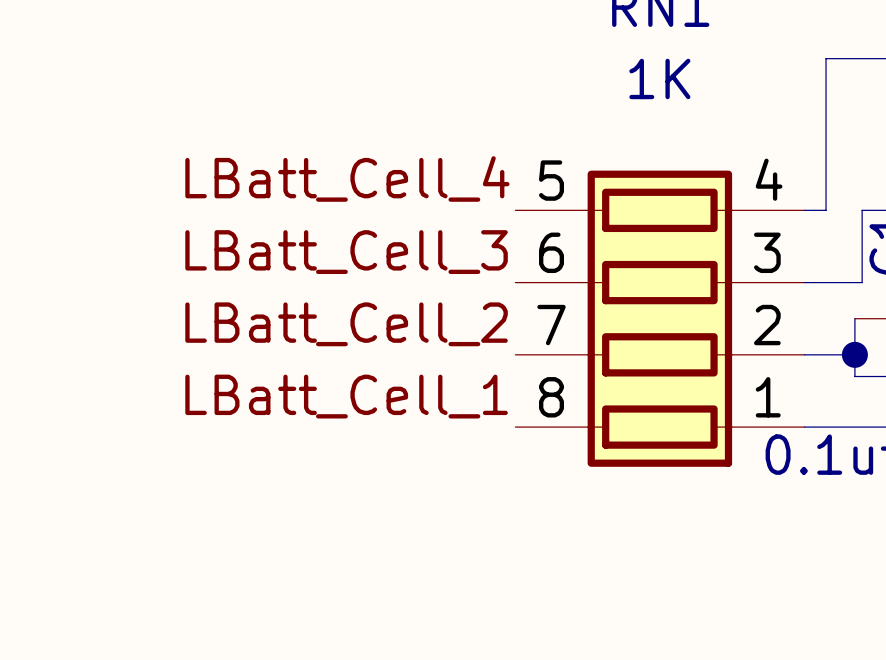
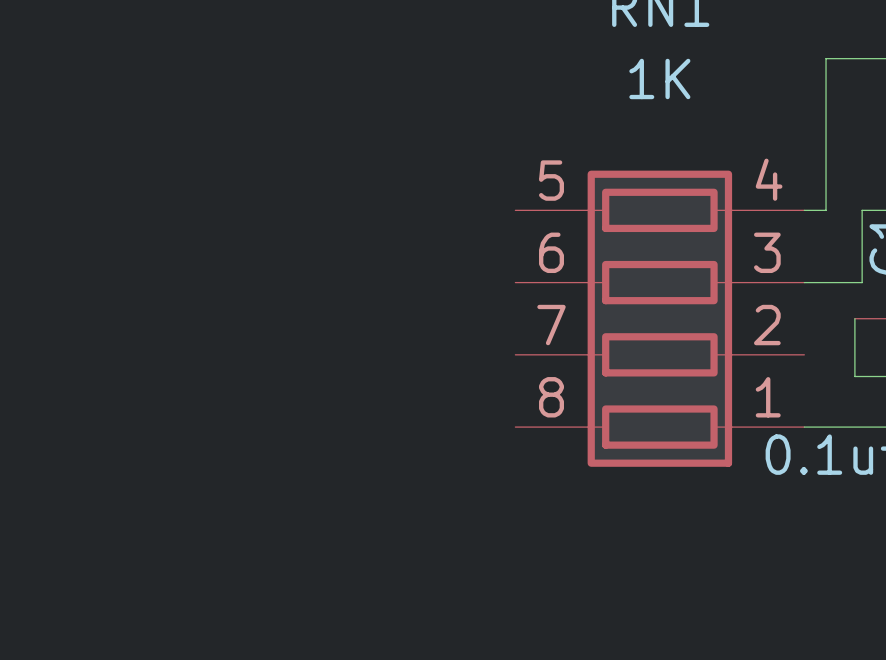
label: LBatt_Cell_4 (347, 178) -> none
label: LBatt_Cell_3 (346, 252) -> none
label: LBatt_Cell_2 (346, 324) -> none
wire: (804, 354) (854, 354) -> none
junction: (854, 354) -> none
label: LBatt_Cell_1 (346, 396) -> none

